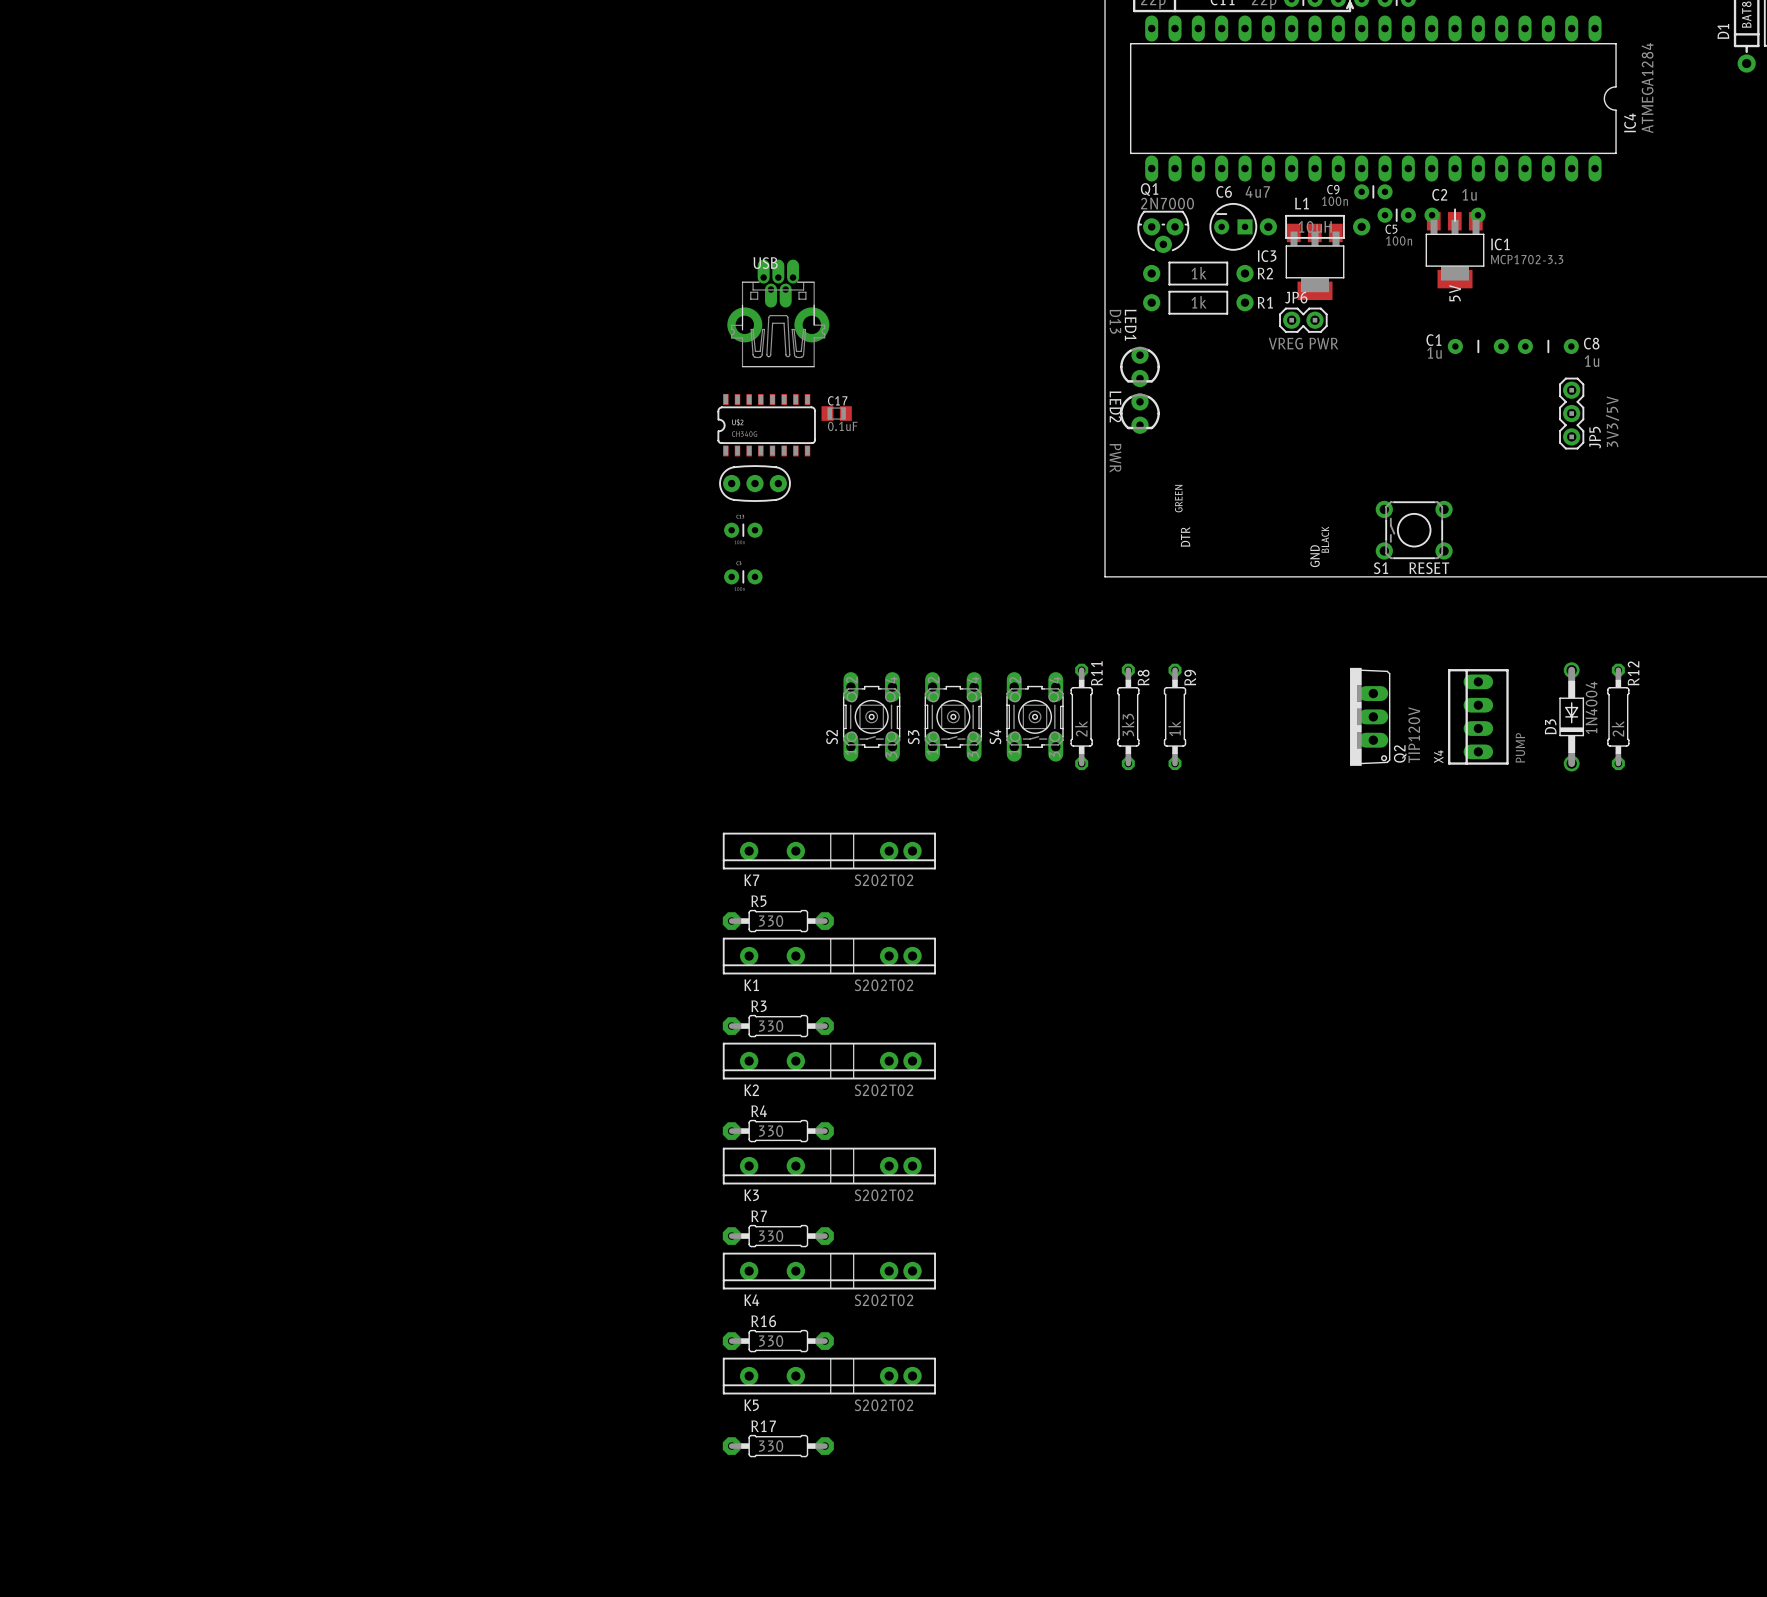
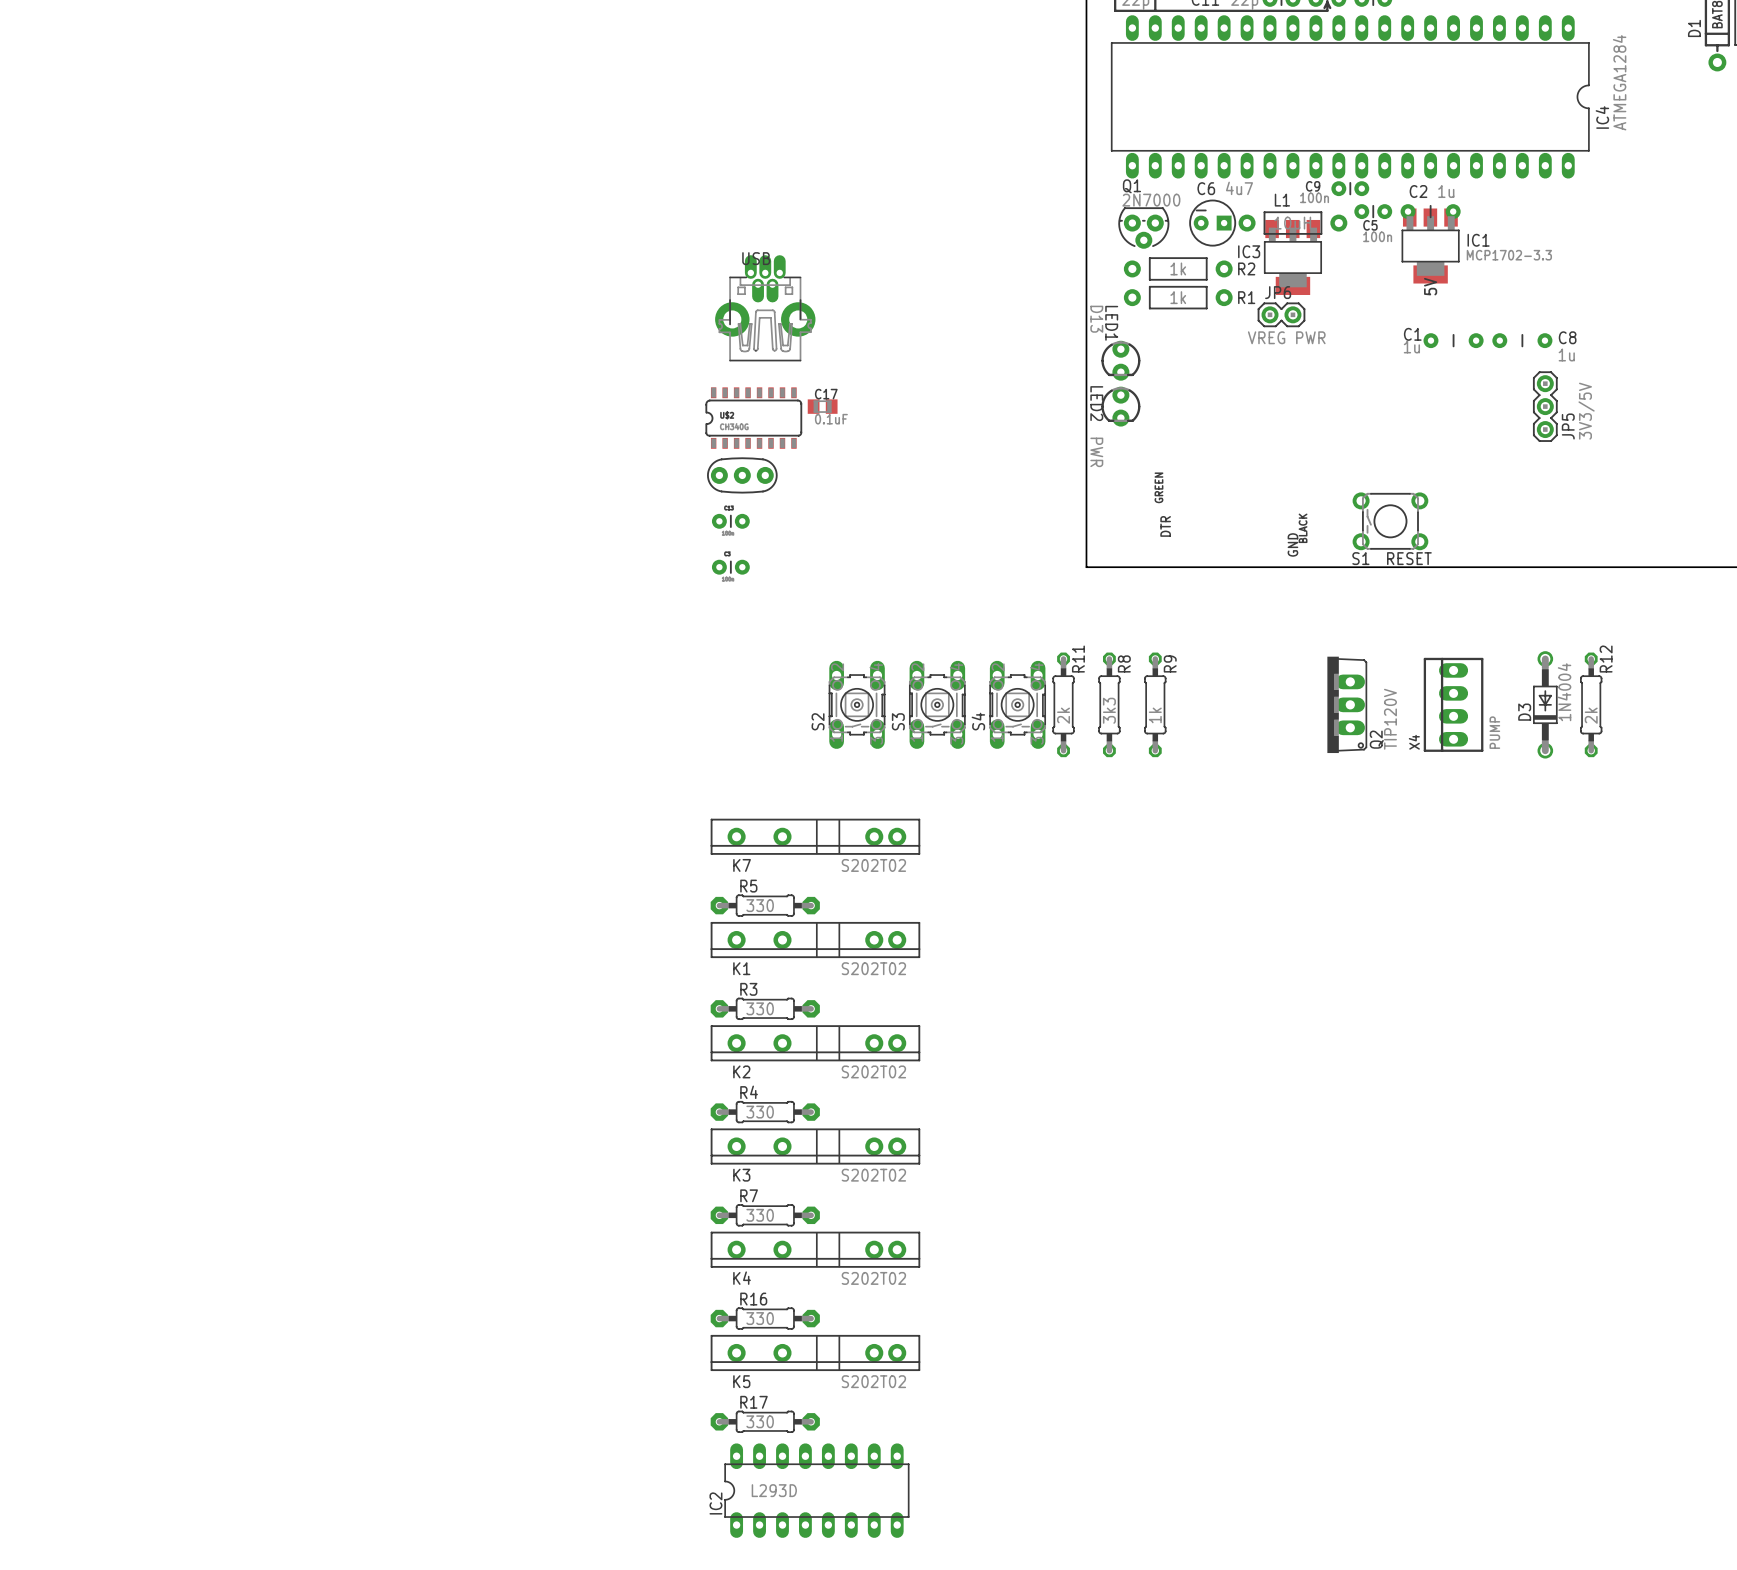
IC2: none -> L293D (816, 1490)

